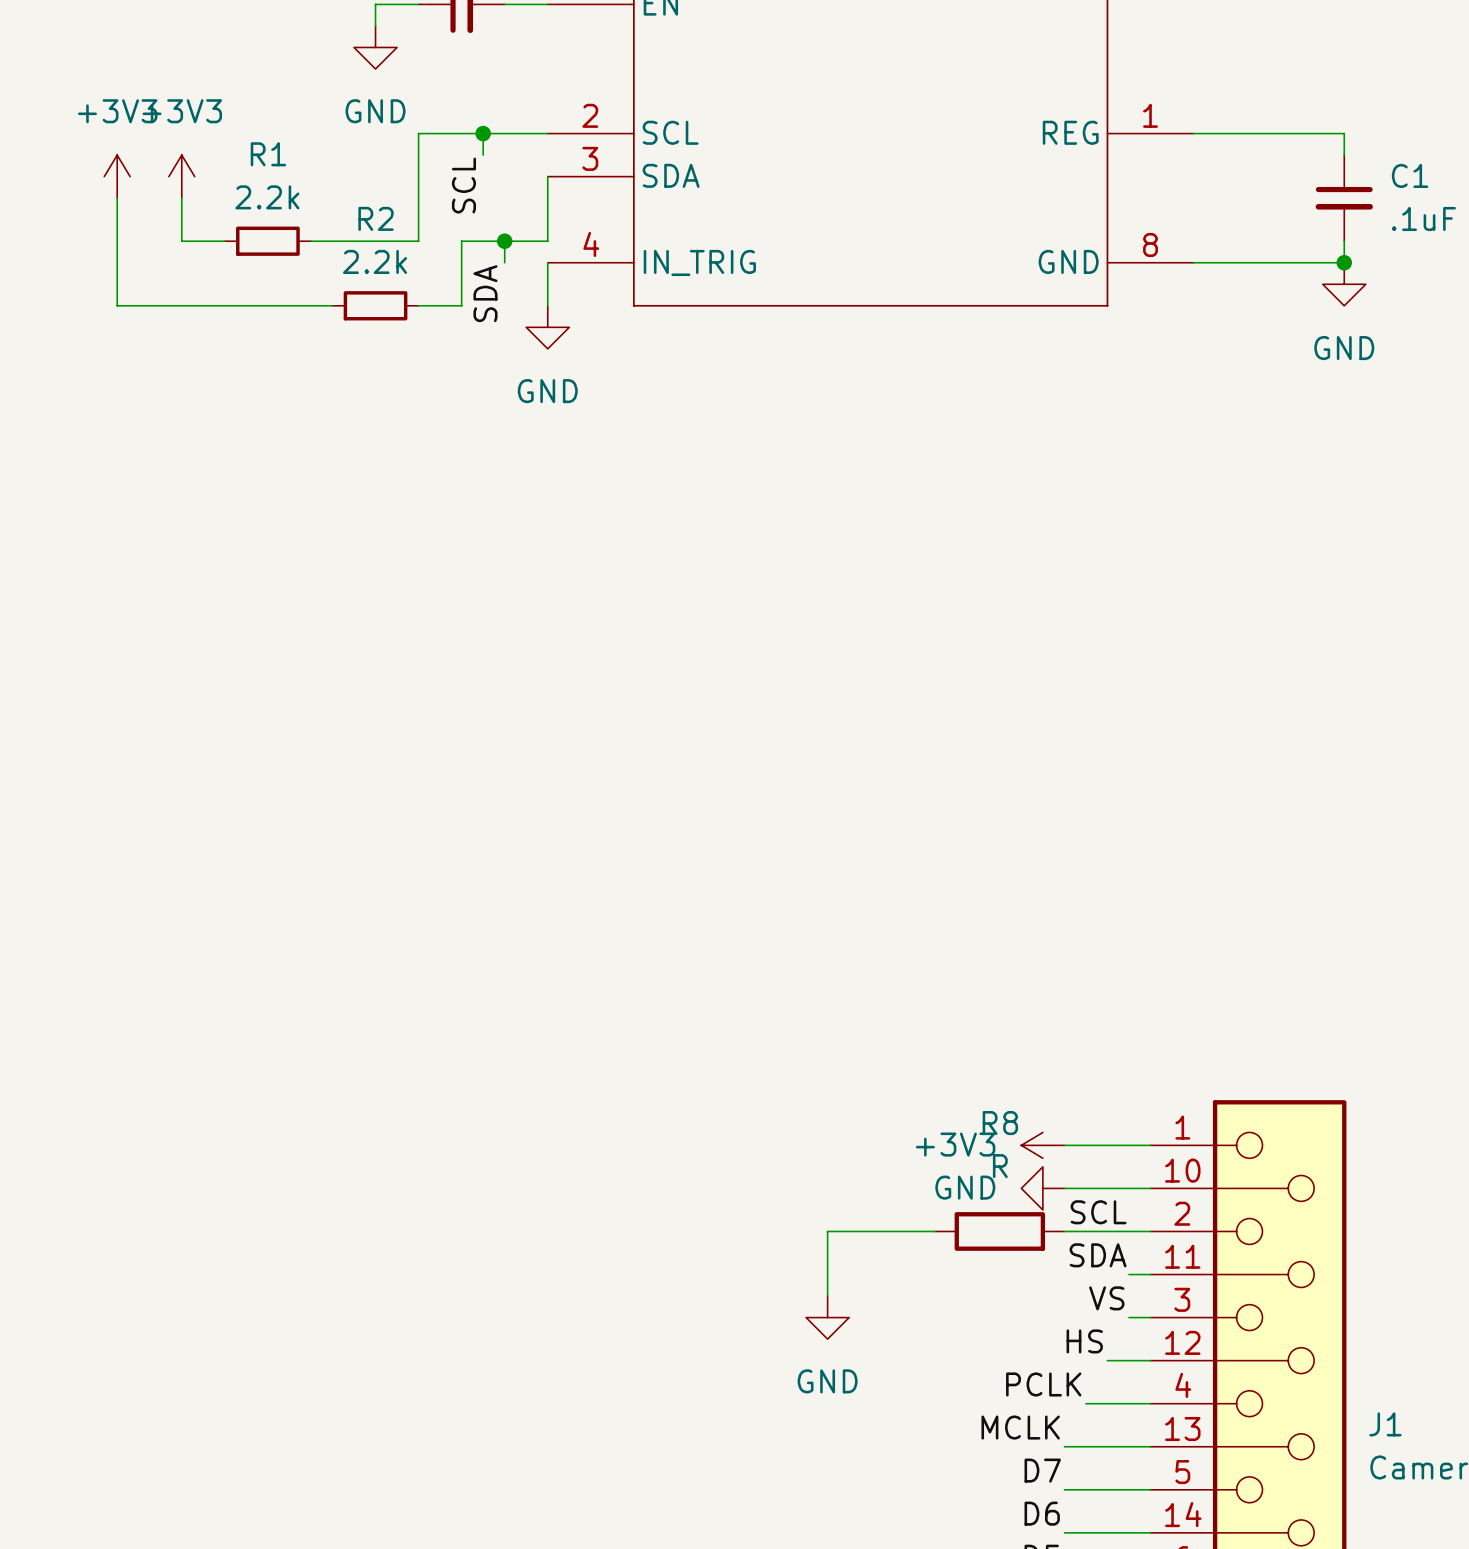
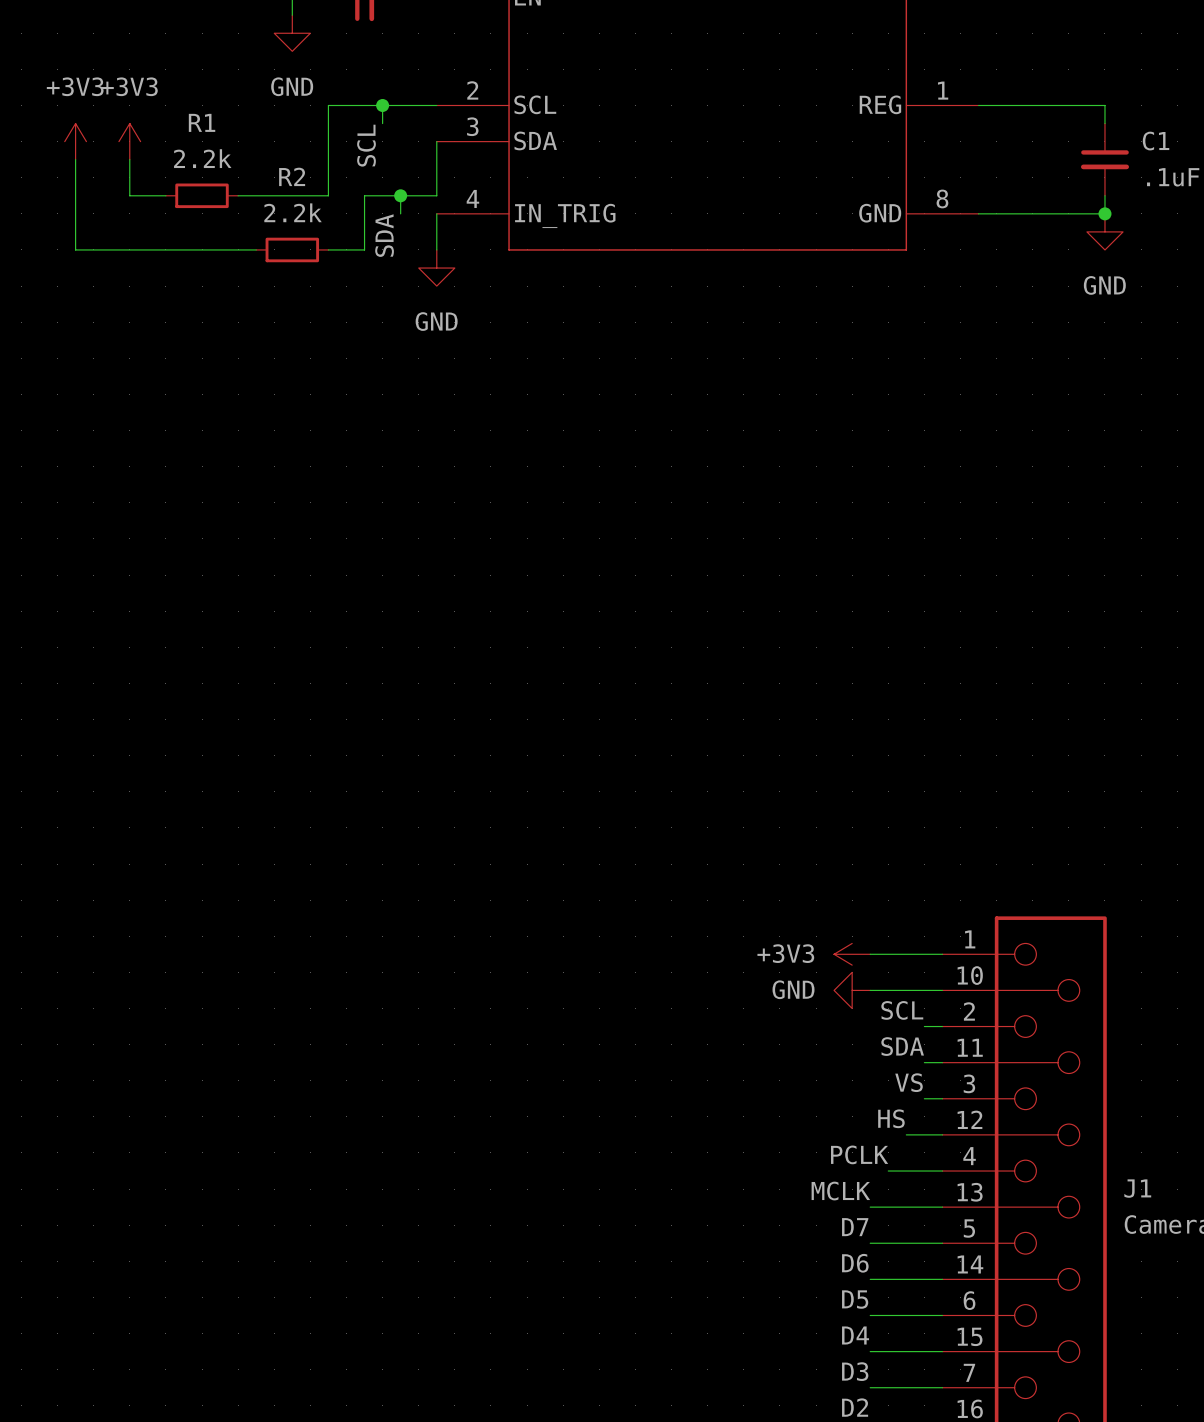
wire: (935, 1231) (827, 1231) (827, 1296) -> none
R8: R (999, 1231) -> none
wire: (1064, 1231) (1128, 1231) -> none
power symbol: GND (827, 1317) -> none

